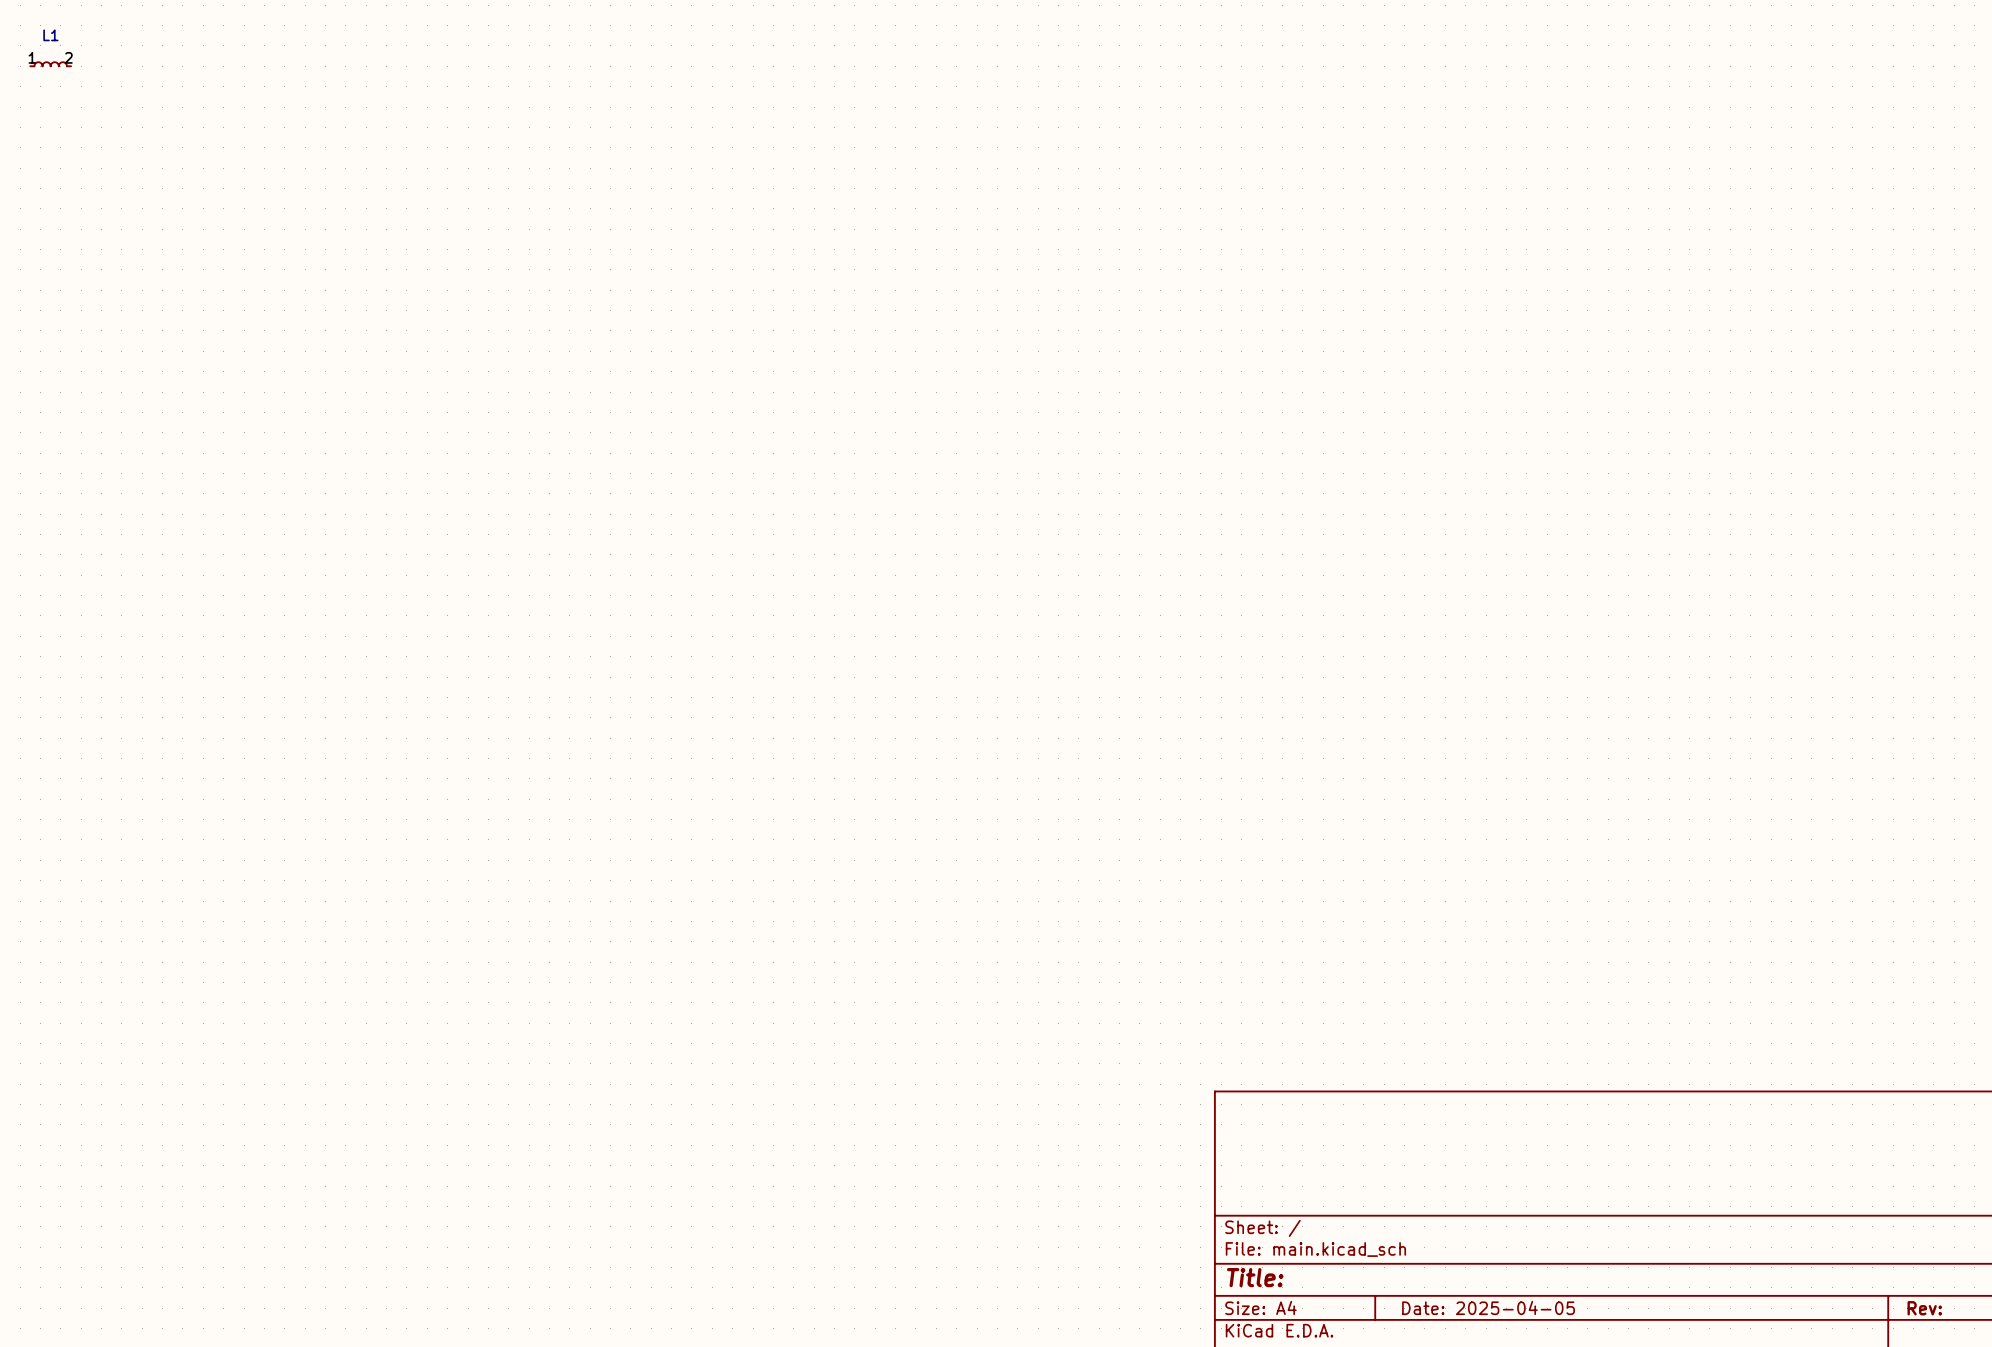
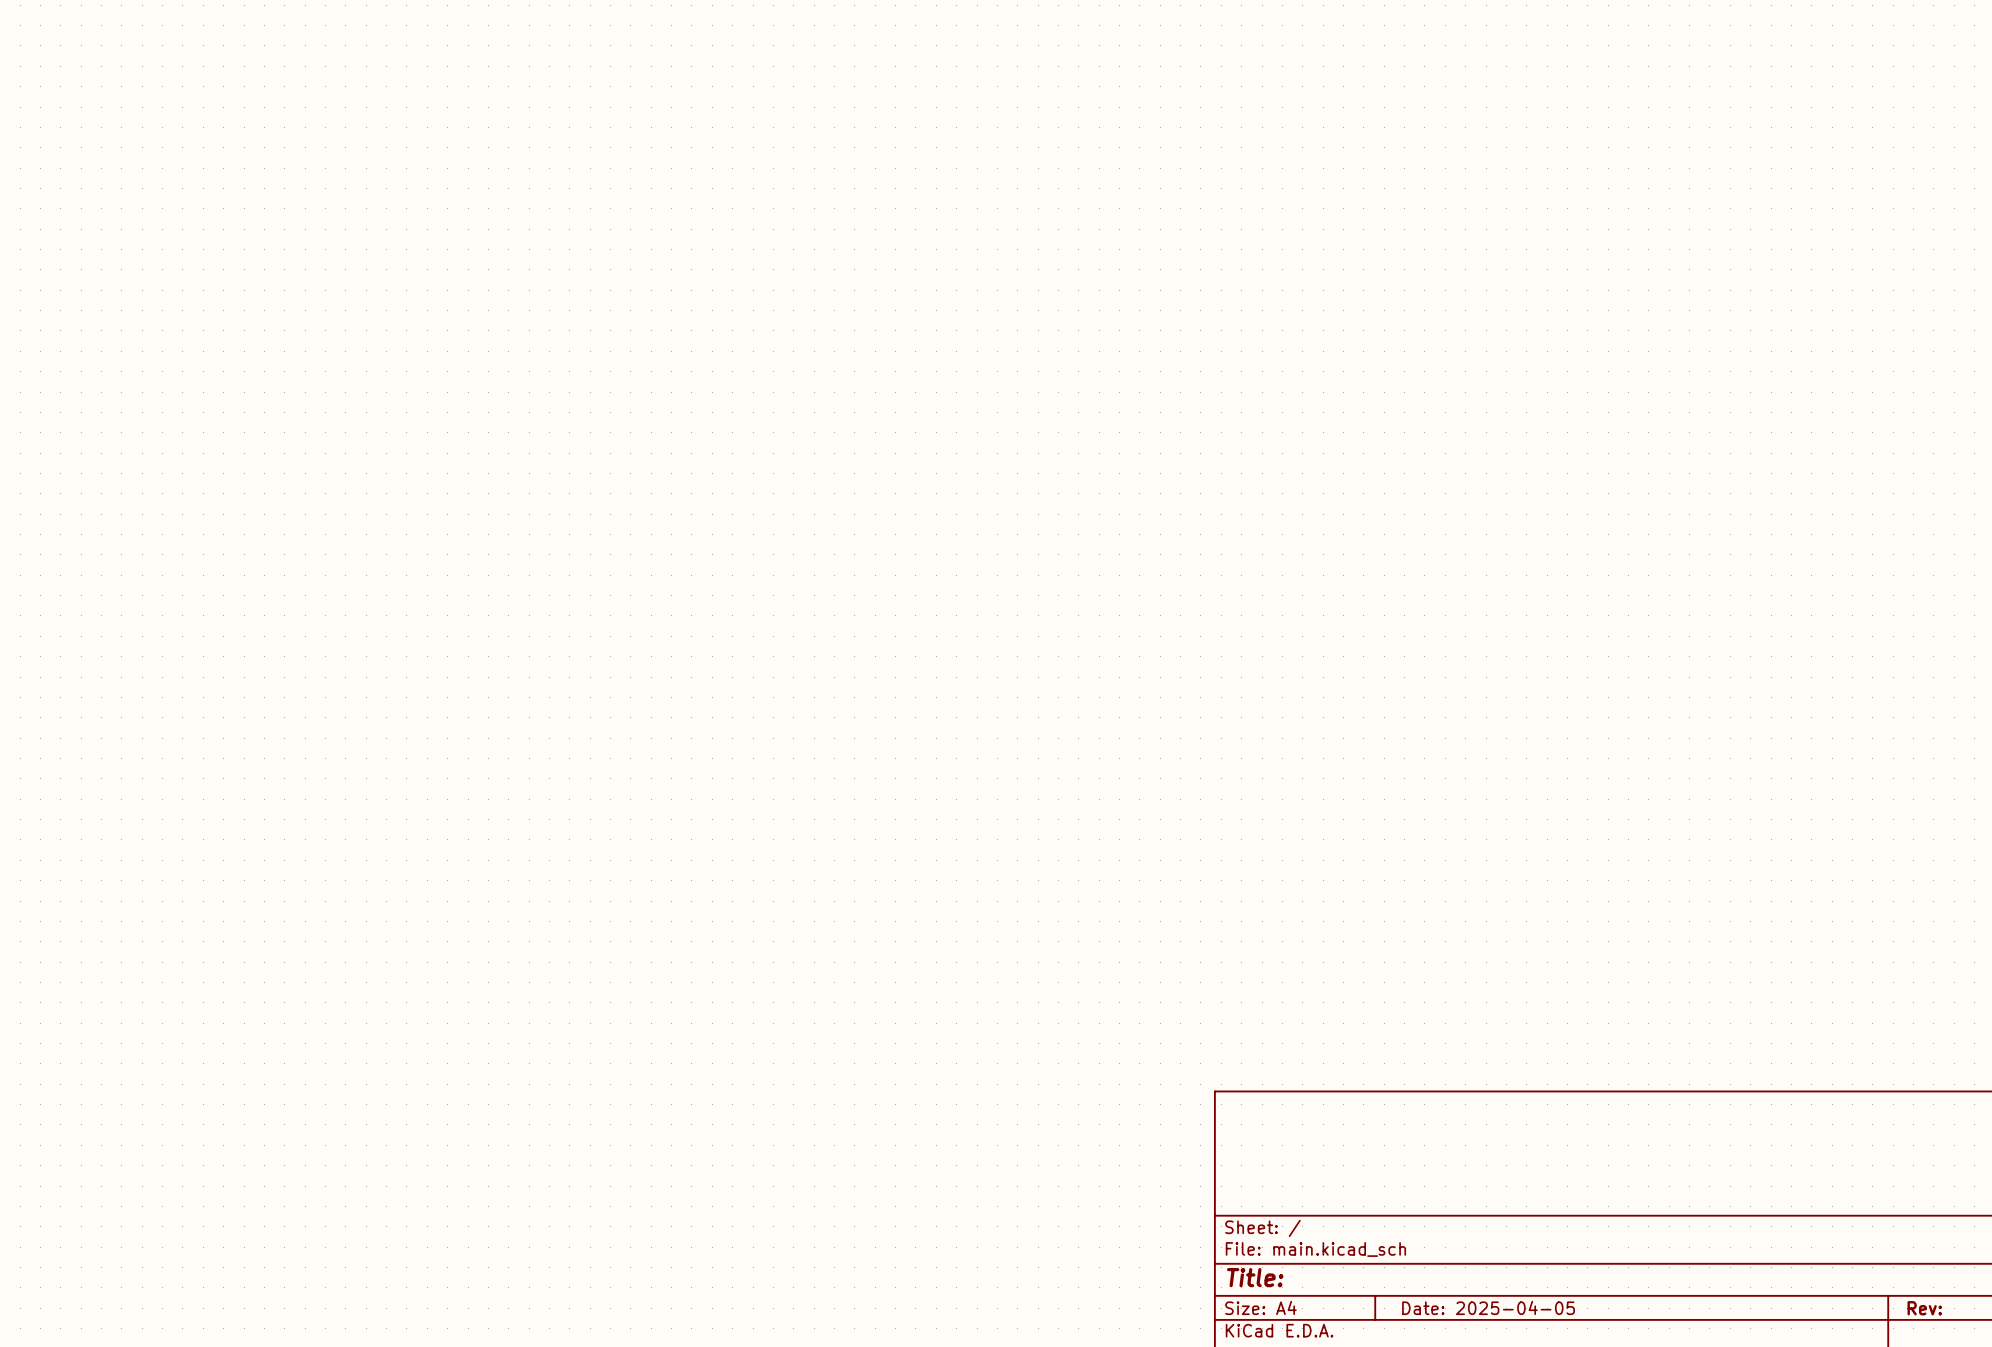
L1: (50, 64) -> none

